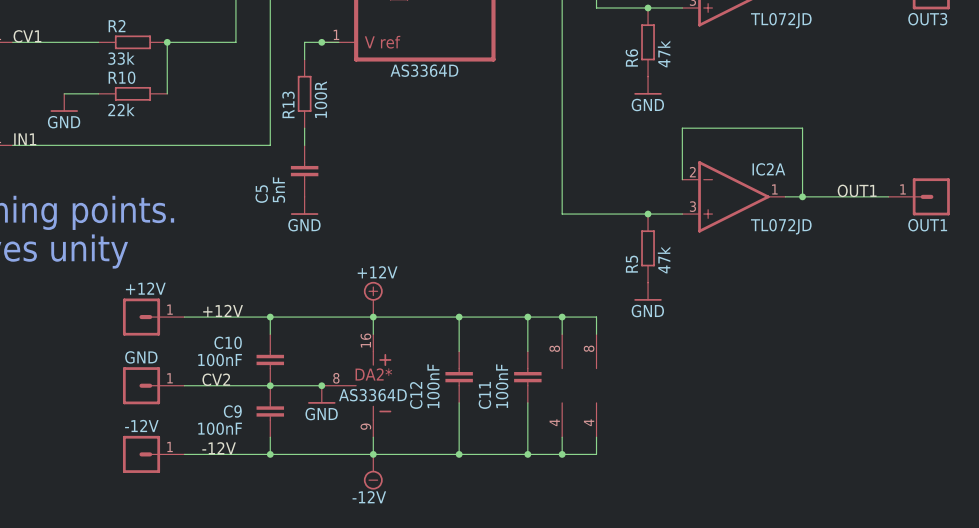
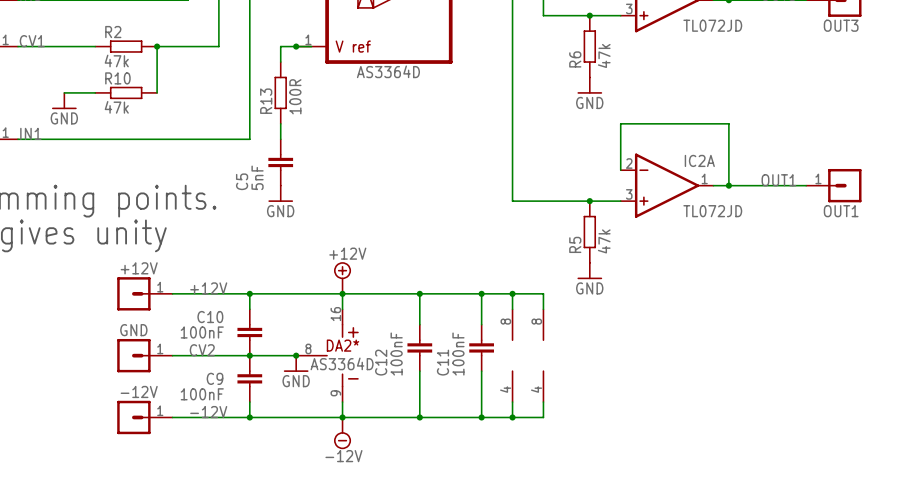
R2 value: 33k (121, 58) -> 47k (116, 60)
R10 value: 22k (121, 109) -> 47k (116, 107)

